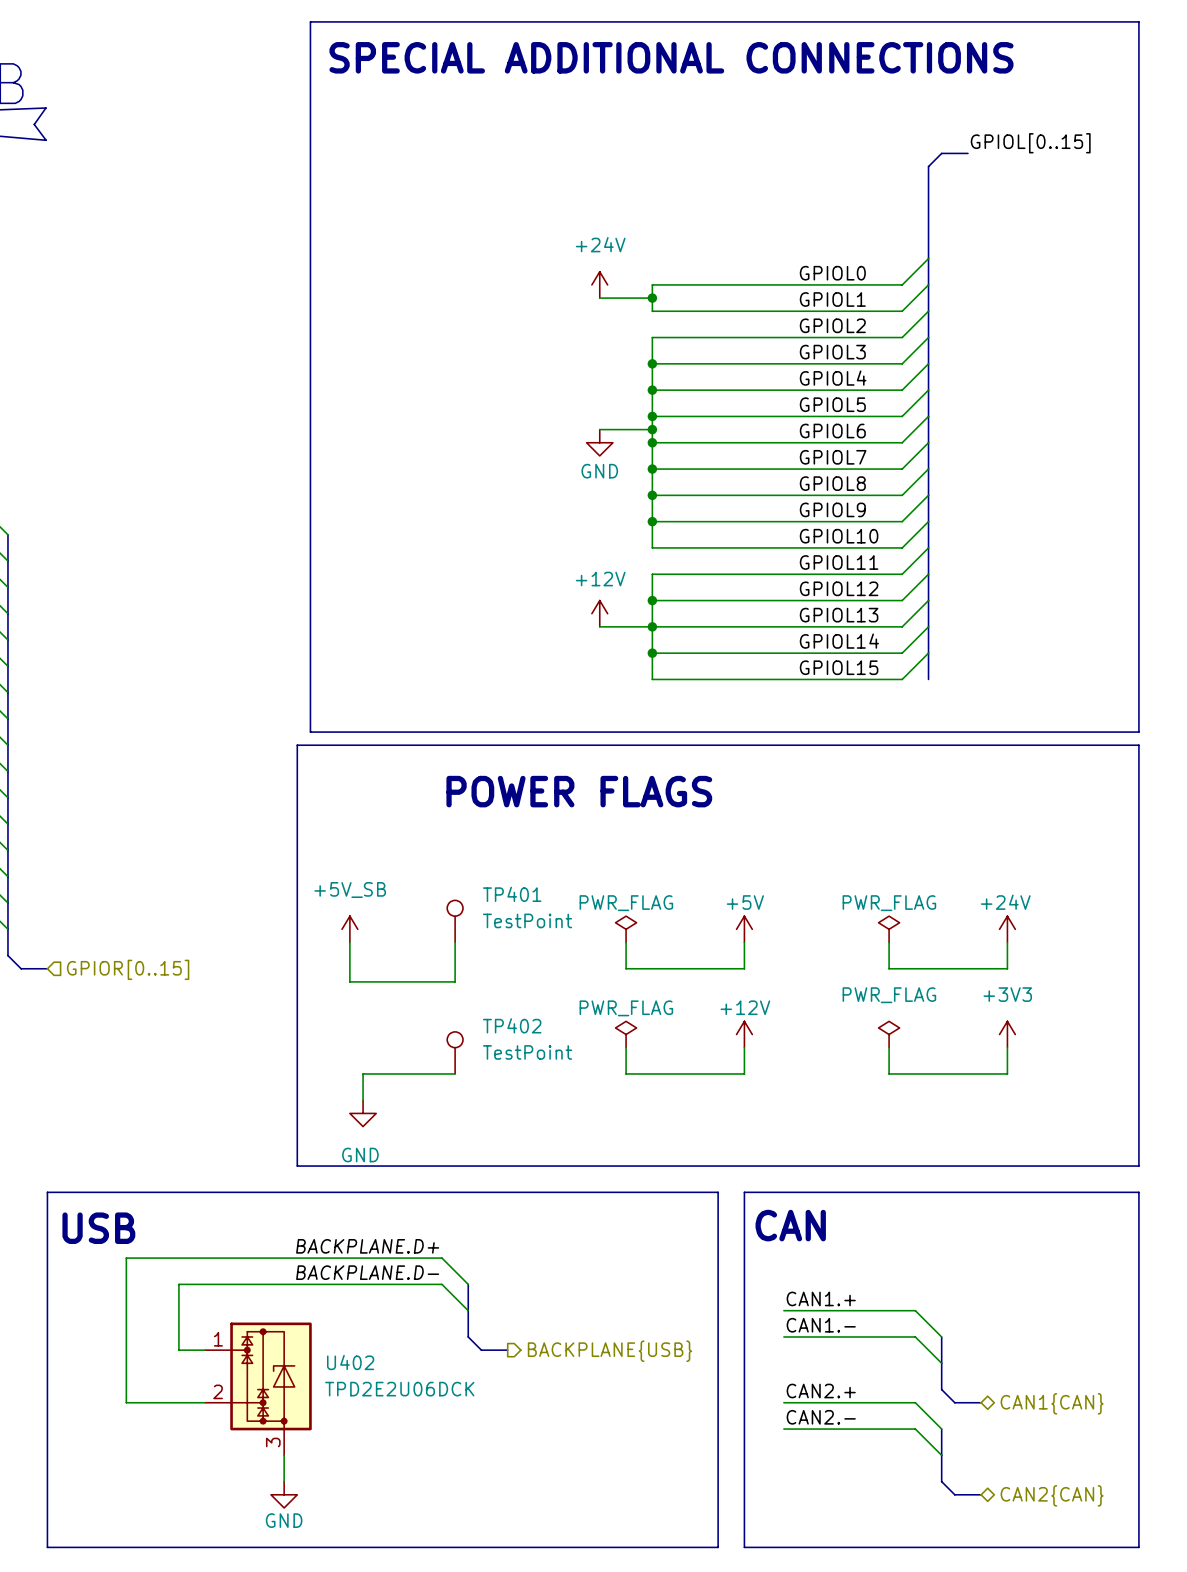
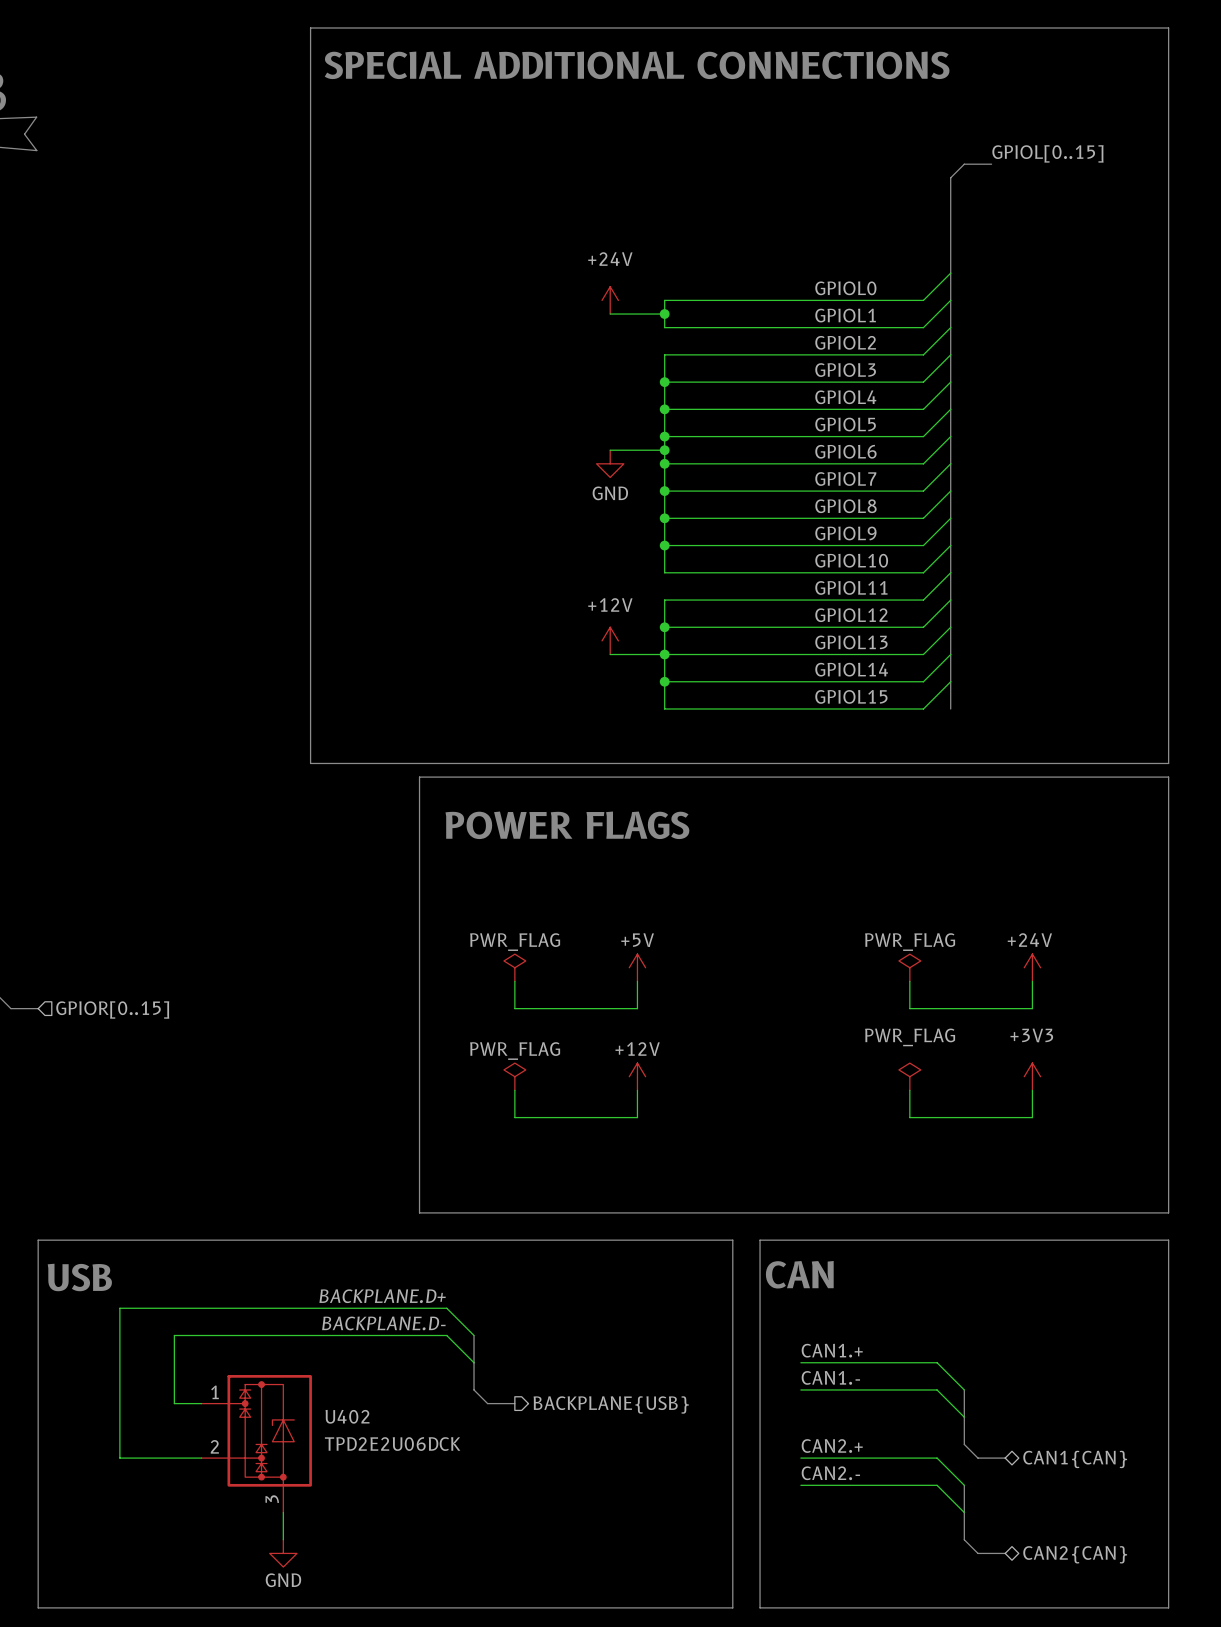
line: (415, 745) (297, 745) (297, 1166) (415, 1166) -> (419, 777) (419, 1212)
TP401: TestPoint (455, 921) -> none
power symbol: +5V_SB (349, 929) -> none
power symbol: none -> PWR_FLAG (514, 967)
power symbol: PWR_FLAG (626, 929) -> +5V (637, 967)
power symbol: +5V (744, 929) -> none
wire: (349, 942) (349, 981) (455, 981) (455, 942) -> none
wire: (744, 942) (744, 968) (626, 968) -> (514, 981) (514, 1008) (637, 1008)
power symbol: none -> PWR_FLAG (514, 1076)
power symbol: PWR_FLAG (626, 1034) -> +12V (637, 1076)
power symbol: +12V (744, 1034) -> none
wire: (744, 1047) (744, 1073) (626, 1073) -> (514, 1090) (514, 1117) (637, 1117)
TP402: TestPoint (455, 1052) -> none
wire: (455, 1073) (363, 1073) (363, 1100) -> none
power symbol: GND (363, 1113) -> none

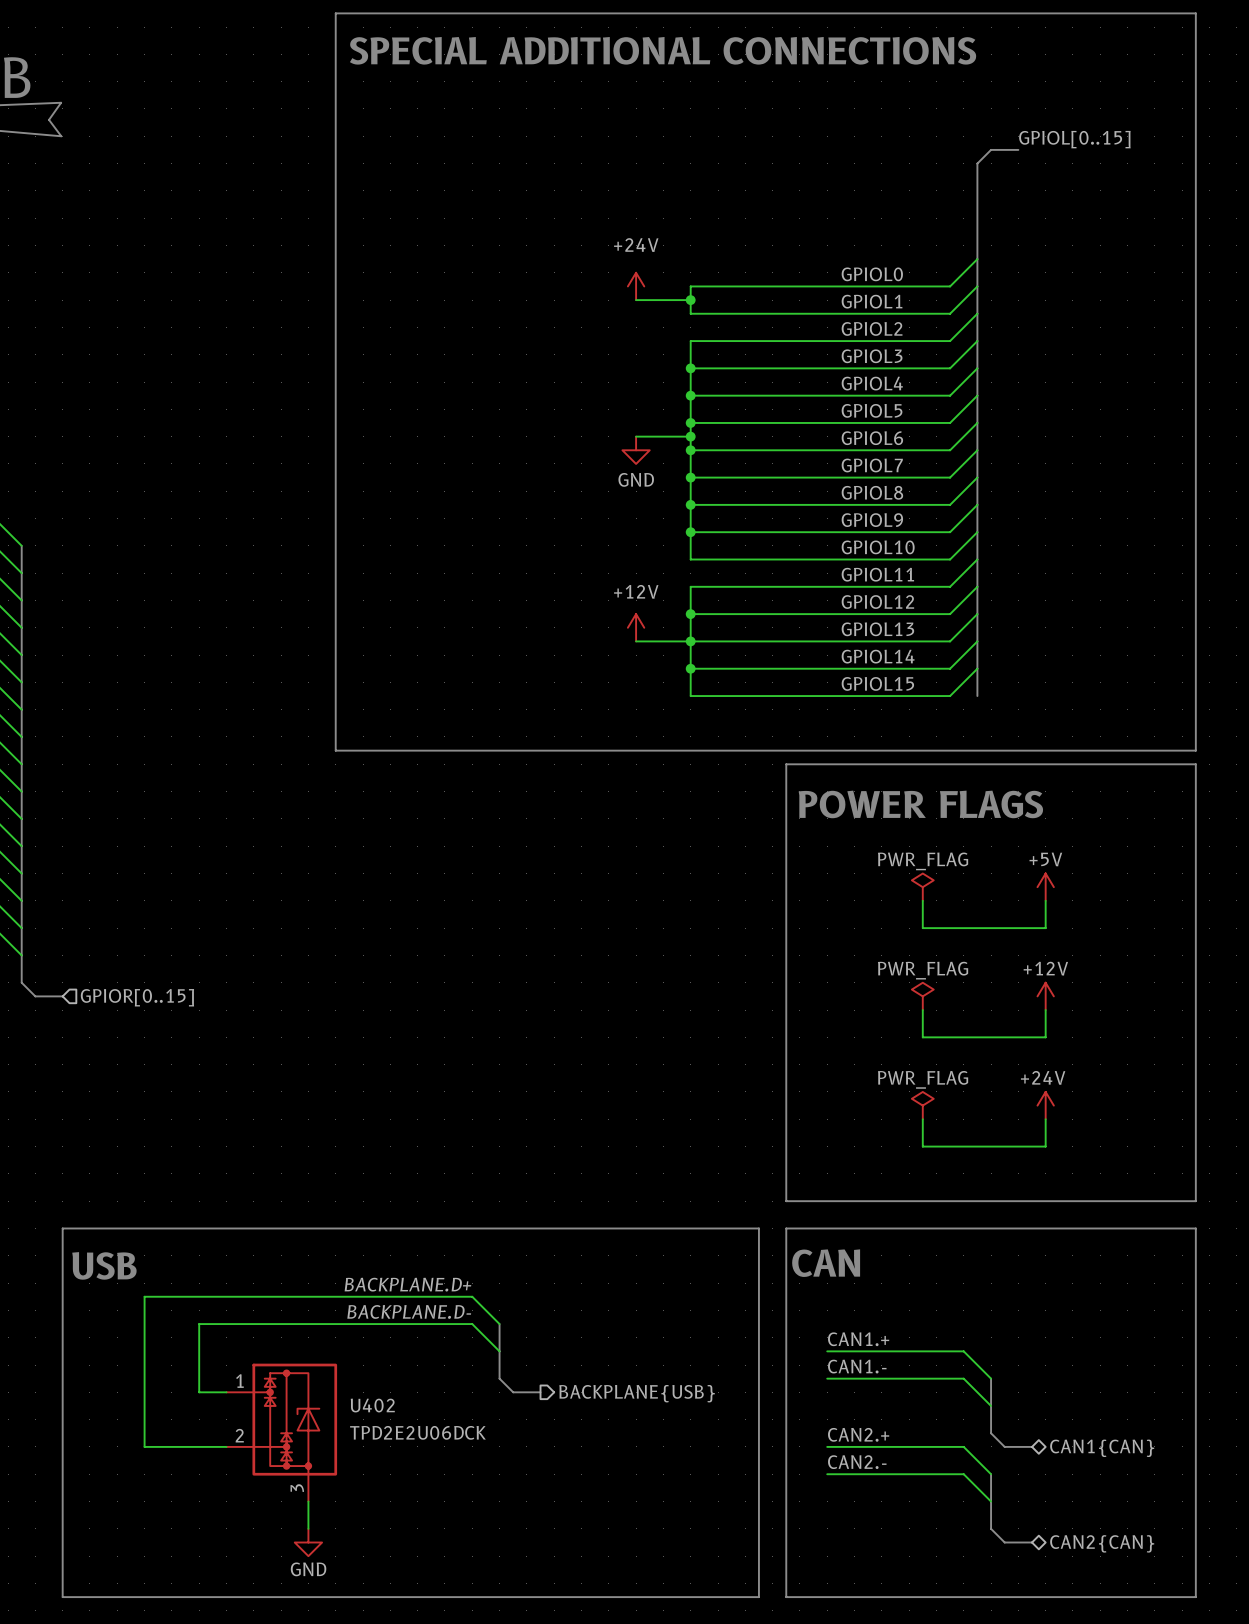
line: (760, 777) (419, 777) (419, 1212) (760, 1212) -> (786, 764) (786, 1201)
text: none -> POWER FLAGS (920, 804)
text: POWER FLAGS (567, 825) -> none
power symbol: none -> PWR_FLAG (922, 887)
power symbol: none -> +5V (1045, 887)
wire: none -> (922, 900) (922, 928) (1045, 928) (1045, 900)
power symbol: PWR_FLAG (514, 967) -> none
power symbol: +5V (637, 967) -> none
power symbol: PWR_FLAG (909, 967) -> none
power symbol position: +24V (1032, 967) -> +24V (1045, 1105)
wire: (514, 981) (514, 1008) (637, 1008) (637, 981) -> none
wire: (909, 981) (909, 1008) (1032, 1008) (1032, 981) -> (922, 1010) (922, 1037) (1045, 1037) (1045, 1010)
power symbol: none -> PWR_FLAG (922, 996)
power symbol: none -> +12V (1045, 996)
power symbol: PWR_FLAG (514, 1076) -> none
power symbol: +12V (637, 1076) -> none
power symbol: PWR_FLAG (909, 1076) -> none
power symbol: +3V3 (1032, 1076) -> none
wire: (514, 1090) (514, 1117) (637, 1117) (637, 1090) -> none
wire: (909, 1090) (909, 1117) (1032, 1117) (1032, 1090) -> (922, 1119) (922, 1146) (1045, 1146) (1045, 1119)
power symbol: none -> PWR_FLAG (922, 1105)

